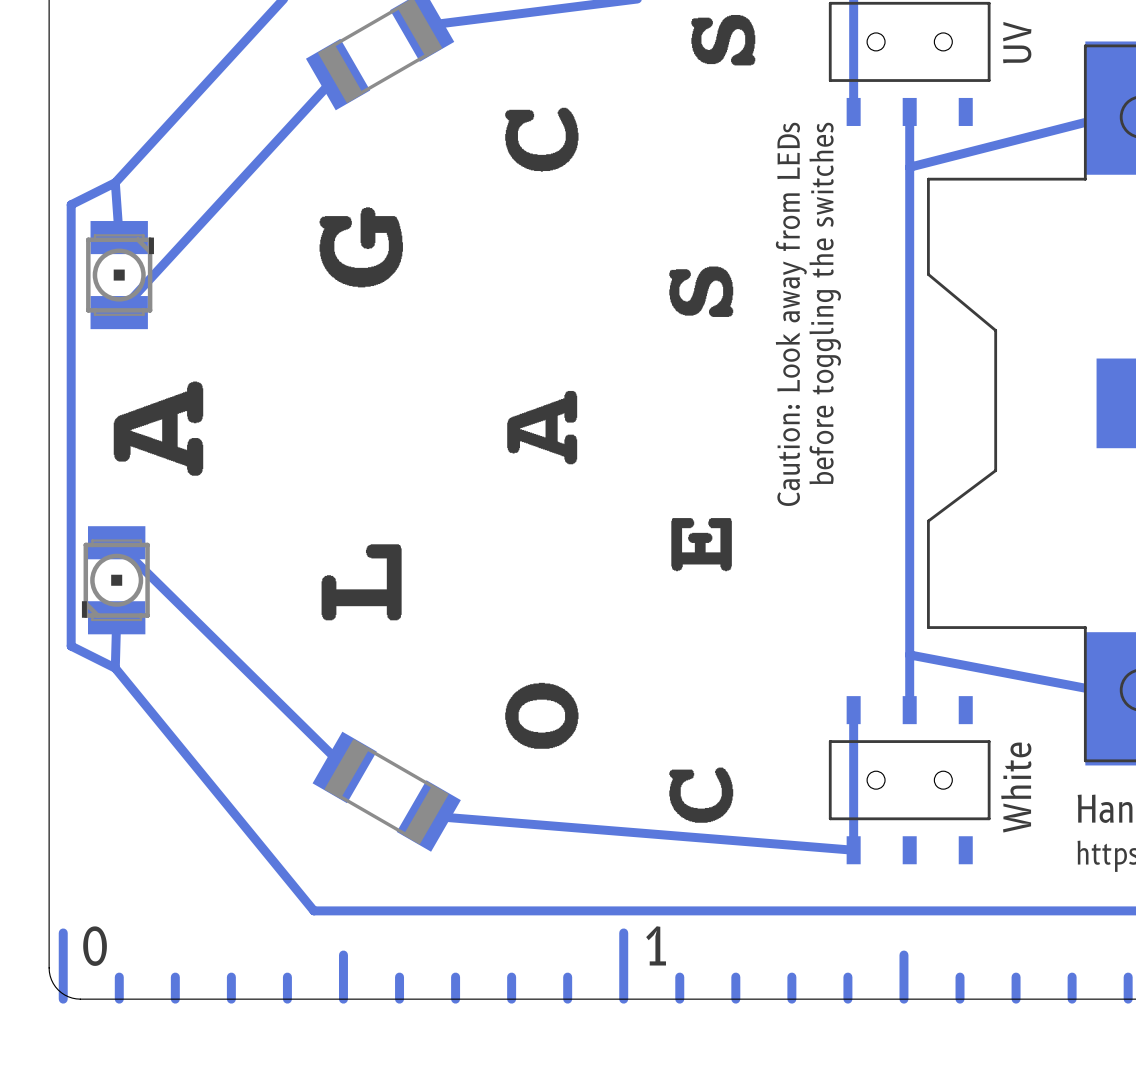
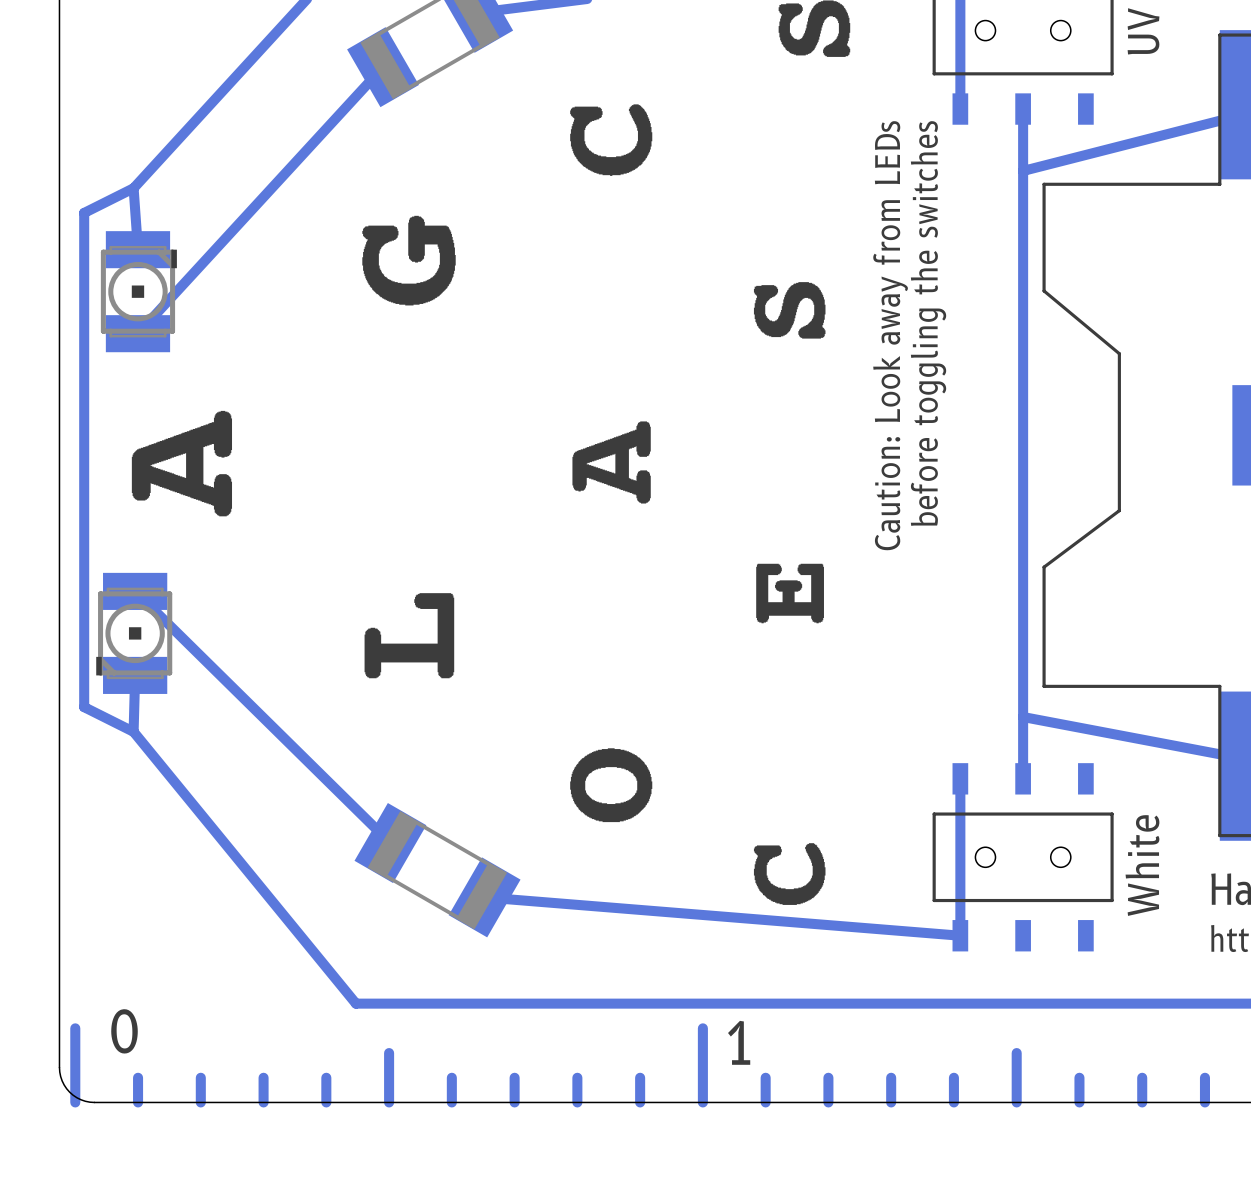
text position: 0 (95, 946) -> 0 (124, 1031)

